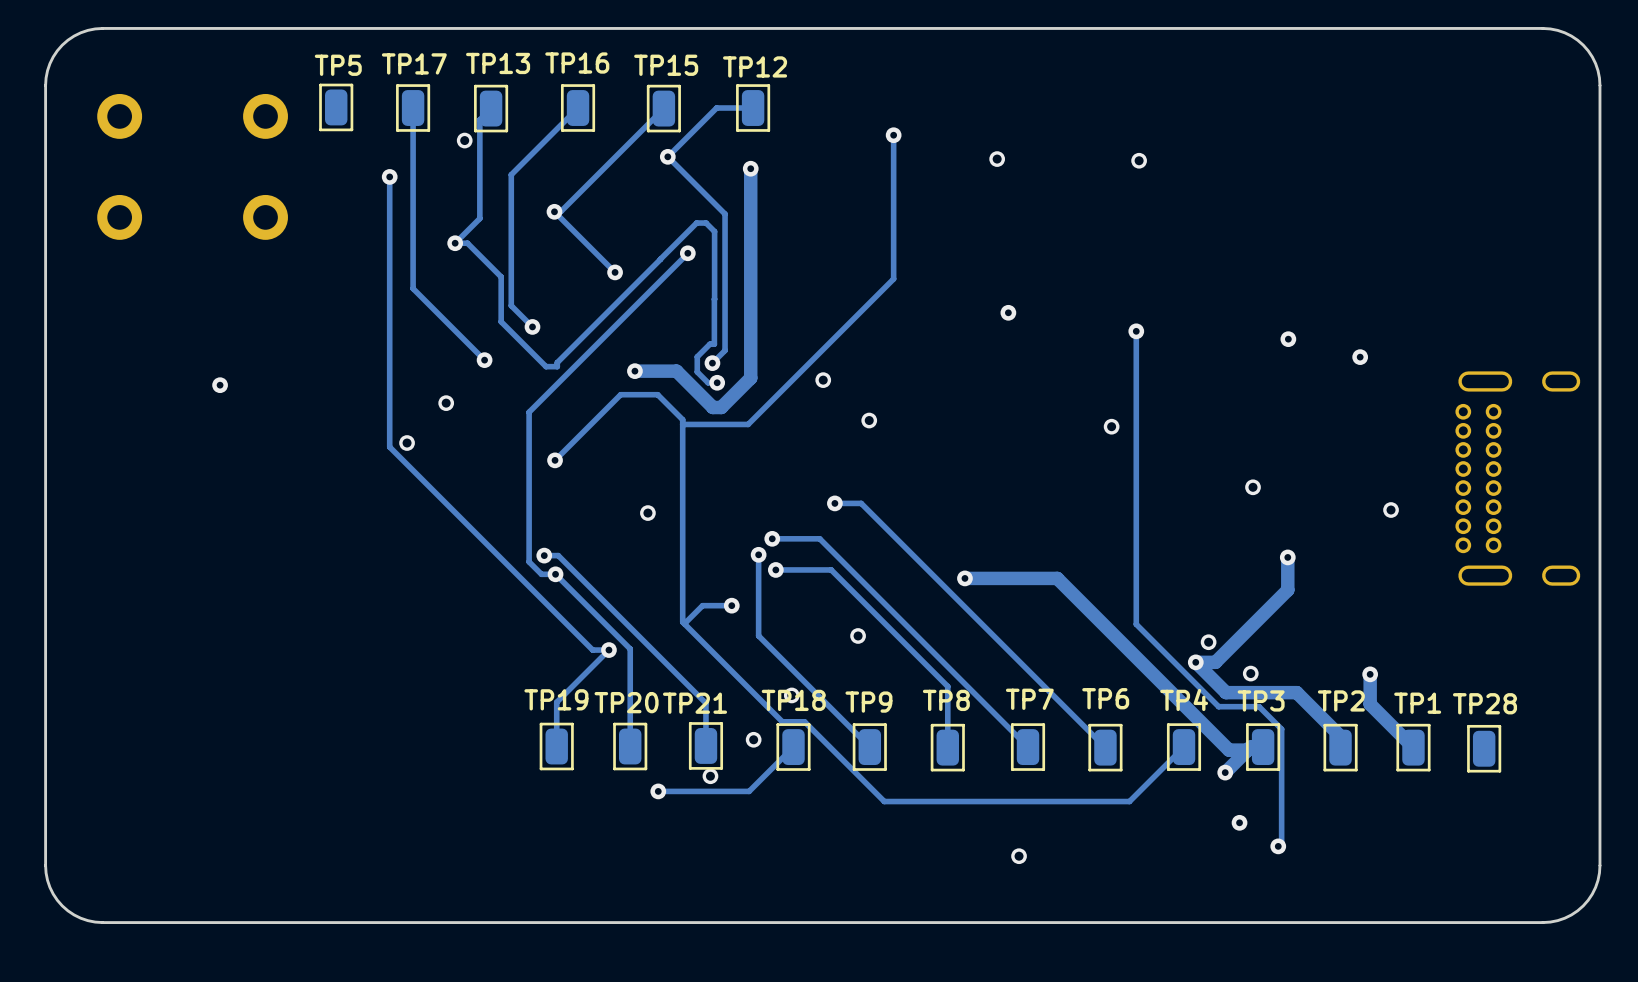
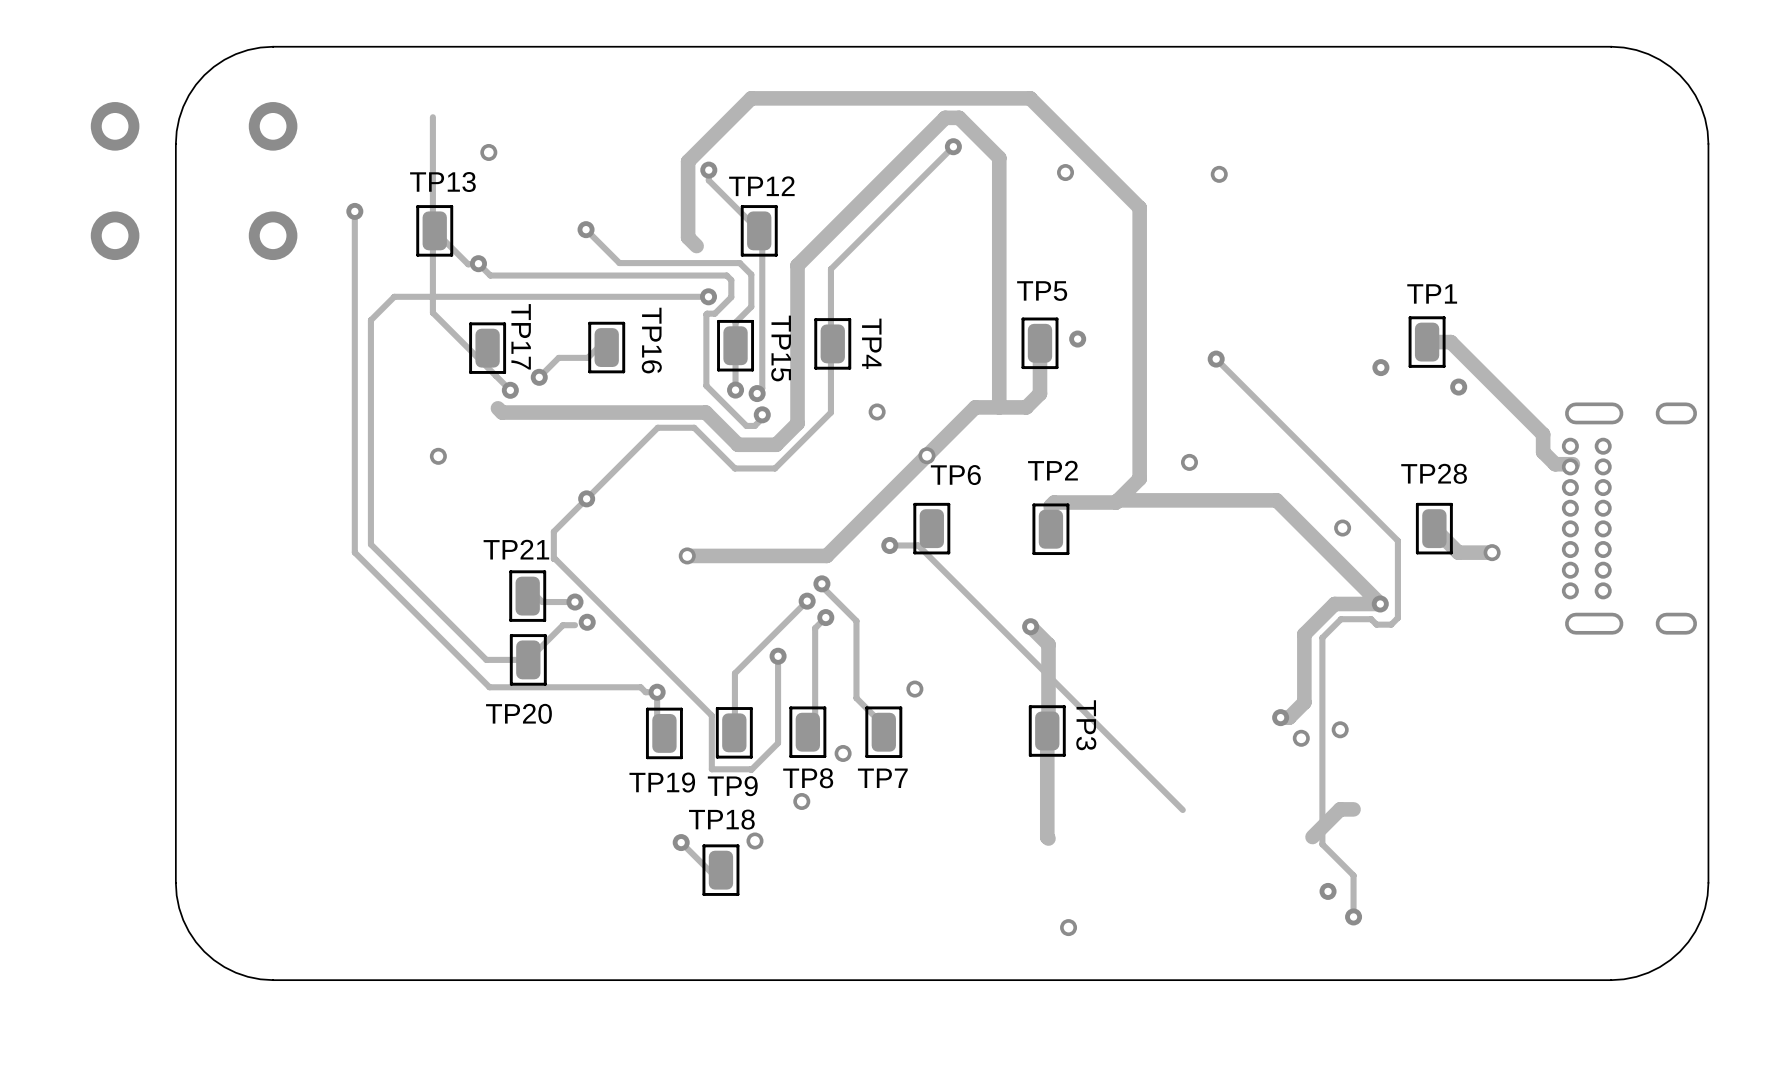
board edge: (1542, 28) (102, 28) (87, 30) (74, 36) (62, 45) (53, 56) (47, 70) (45, 85) (45, 865) (47, 880) (53, 894) (62, 905) (74, 914) (87, 920) (102, 922) (1542, 922) (1557, 920) (1571, 914) (1583, 905) (1592, 894) (1598, 880) (1599, 865) (1599, 85) (1595, 63) (1583, 45) (1564, 32) (1542, 28) -> (1611, 46) (1636, 50) (1648, 54) (1659, 59) (1679, 75) (1695, 95) (1701, 106) (1705, 118) (1708, 143) (1708, 882) (1705, 908) (1695, 931) (1679, 951) (1659, 967) (1636, 976) (1611, 980) (273, 980) (247, 976) (224, 967) (204, 951) (188, 931) (179, 908) (175, 882) (175, 143) (179, 118) (188, 95) (204, 75) (224, 59) (247, 50) (273, 46) (1611, 46)
TP17 name rotation: 0° (414, 63) -> 90° clockwise (521, 336)
TP16 name rotation: 0° (577, 63) -> 90° clockwise (651, 340)
TP5 name position: TP5 (338, 65) -> TP5 (1042, 291)
TP15 name rotation: 0° (666, 65) -> 90° clockwise (781, 348)
TP5 position: (336, 107) -> (1039, 343)
TP17 position: (413, 108) -> (487, 348)
track: (491, 108) (479, 119) (479, 218) (455, 243) (467, 243) (501, 276) (501, 321) (546, 366) (557, 366) (557, 362) (696, 223) (706, 223) (714, 231) (714, 299) -> none
TP13 position: (491, 108) -> (434, 230)
track: (578, 108) (511, 174) (511, 305) (532, 326) -> none
TP16 position: (578, 108) -> (606, 347)
track: (663, 108) (560, 211) (554, 211) -> none
TP15 position: (663, 108) -> (735, 345)
track: (753, 108) (716, 108) (667, 156) (725, 214) (725, 350) (717, 358) -> (708, 170) (708, 180) (762, 233) (762, 388)
TP12 position: (753, 108) -> (759, 230)
track: (893, 135) (893, 278) (748, 424) (682, 424) -> (953, 146) (830, 269) (830, 342) (832, 343) (830, 345) (830, 412) (775, 468) (734, 468) (694, 427)
track: (750, 168) (750, 378) (721, 407) (712, 407) (676, 371) (634, 371) -> none
via: (750, 168) -> none
track: (389, 176) (389, 447) (592, 650) (608, 650) (556, 702) (556, 746) -> none
via position: (389, 176) -> (354, 211)
track: none -> (354, 211) (354, 552) (489, 687) (640, 687) (645, 692) (657, 692) (657, 726) (664, 733)
track: none -> (696, 246) (688, 237) (688, 161) (751, 98) (1030, 98) (1139, 207) (1139, 478) (1115, 502) (1054, 502) (1050, 505) (1050, 529)
track: (585, 242) (615, 272) -> (619, 263) (739, 263) (751, 274) (751, 306) (735, 322) (735, 390)
track: (687, 253) (529, 412) (529, 561) (541, 574) (555, 574) (630, 648) (630, 746) -> none
via: (687, 253) -> none
via: (615, 272) -> none
track: none -> (708, 296) (394, 296) (370, 320) (370, 544) (486, 659) (528, 659) (563, 625) (575, 625)
via: none -> (708, 296)
track: (714, 299) (714, 344) (709, 344) (697, 356) (697, 371) (708, 382) (717, 382) -> (434, 230) (468, 264) (478, 263) (490, 275) (726, 275) (731, 280) (731, 297) (714, 313) (706, 314) (706, 385) (746, 425) (754, 425) (762, 418) (762, 414)
track: none -> (1427, 342) (1450, 342) (1543, 434) (1543, 452) (1555, 464) (1572, 464)
track: none -> (1039, 343) (1039, 393) (1026, 407) (975, 407) (826, 555) (687, 555)
track: none -> (606, 347) (598, 347) (587, 357) (558, 357) (539, 377)
via position: (532, 326) -> (539, 377)
track: (1136, 331) (1136, 624) (1218, 706) (1259, 706) (1281, 729) (1281, 842) (1278, 846) -> (1216, 359) (1397, 540) (1397, 617) (1391, 624) (1376, 624) (1371, 619) (1341, 619) (1322, 637) (1322, 844) (1353, 875) (1353, 916)
via: none -> (735, 390)
via: (634, 371) -> none
track: none -> (999, 407) (999, 157) (959, 117) (945, 117) (797, 265) (797, 423) (776, 444) (738, 444) (705, 412) (502, 412) (497, 408)
via: (220, 385) -> none
track: (654, 394) (657, 394) (682, 419) (682, 622) (782, 721) (804, 721) (884, 801) (1129, 801) (1184, 747) -> none
via: (446, 403) -> none
via: none -> (438, 456)
via: (407, 443) -> none
track: none -> (1434, 528) (1458, 552) (1492, 552)
track: (772, 538) (819, 538) (1028, 747) -> (821, 583) (821, 586) (856, 621) (856, 698) (883, 725) (883, 732)
track: (758, 554) (758, 635) (869, 747) -> (807, 601) (734, 673) (734, 732)
track: (544, 555) (558, 555) (705, 703) (705, 745) -> (574, 602) (542, 602) (536, 596) (527, 596)
track: (1287, 557) (1287, 590) (1215, 662) (1203, 662) -> (1118, 500) (1276, 500) (1380, 603) (1334, 603) (1304, 634) (1304, 702) (1289, 717)
track: (775, 569) (831, 569) (947, 686) (947, 747) -> (825, 617) (815, 628) (815, 715) (807, 722) (807, 732)
track: (964, 578) (1057, 578) (1228, 750) (1247, 750) -> (1030, 626) (1048, 644) (1048, 838)
track: (731, 605) (702, 605) (684, 623) -> (778, 656) (778, 743) (751, 769) (711, 769) (711, 715) (553, 559) (553, 531) (586, 498)
via position: (1208, 642) -> (1301, 738)
via position: (608, 650) -> (657, 692)
track: (1195, 662) (1226, 692) (1296, 692) (1340, 736) (1340, 747) -> none
track: (1370, 674) (1370, 704) (1413, 747) -> none
via: (1370, 674) -> none
TP6 name position: TP6 (1105, 698) -> TP6 (955, 475)
TP19 name position: TP19 (556, 699) -> TP19 (662, 782)
TP7 name position: TP7 (1029, 699) -> TP7 (882, 778)
TP4 name rotation: 0° (1184, 699) -> 90° clockwise (871, 343)
TP8 name position: TP8 (946, 700) -> TP8 (808, 778)
TP3 name rotation: 0° (1261, 700) -> 90° clockwise (1086, 725)
TP2 name position: TP2 (1341, 700) -> TP2 (1052, 470)
TP20 name position: TP20 (626, 702) -> TP20 (518, 713)
TP9 name position: TP9 (868, 702) -> TP9 (732, 786)
TP28 name position: TP28 (1485, 703) -> TP28 (1434, 473)
TP21 position: (705, 745) -> (527, 596)
TP19 position: (556, 746) -> (664, 733)
TP20 position: (630, 746) -> (528, 659)
track: (793, 747) (749, 791) (656, 791) -> none
TP18 position: (793, 747) -> (720, 870)
TP9 position: (869, 747) -> (734, 732)
TP8 position: (947, 747) -> (807, 732)
TP7 position: (1028, 747) -> (883, 732)
TP6 position: (1105, 747) -> (931, 528)
TP4 position: (1184, 747) -> (832, 343)
TP3 position: (1263, 747) -> (1047, 731)
TP2 position: (1340, 747) -> (1050, 529)
TP1 position: (1413, 747) -> (1427, 342)
TP28 position: (1484, 748) -> (1434, 528)
via: (1225, 772) -> none
track: none -> (681, 842) (712, 873) (717, 873) (720, 870)
via position: (658, 791) -> (681, 842)
via position: (1278, 846) -> (1353, 916)
via position: (1019, 856) -> (1068, 927)

